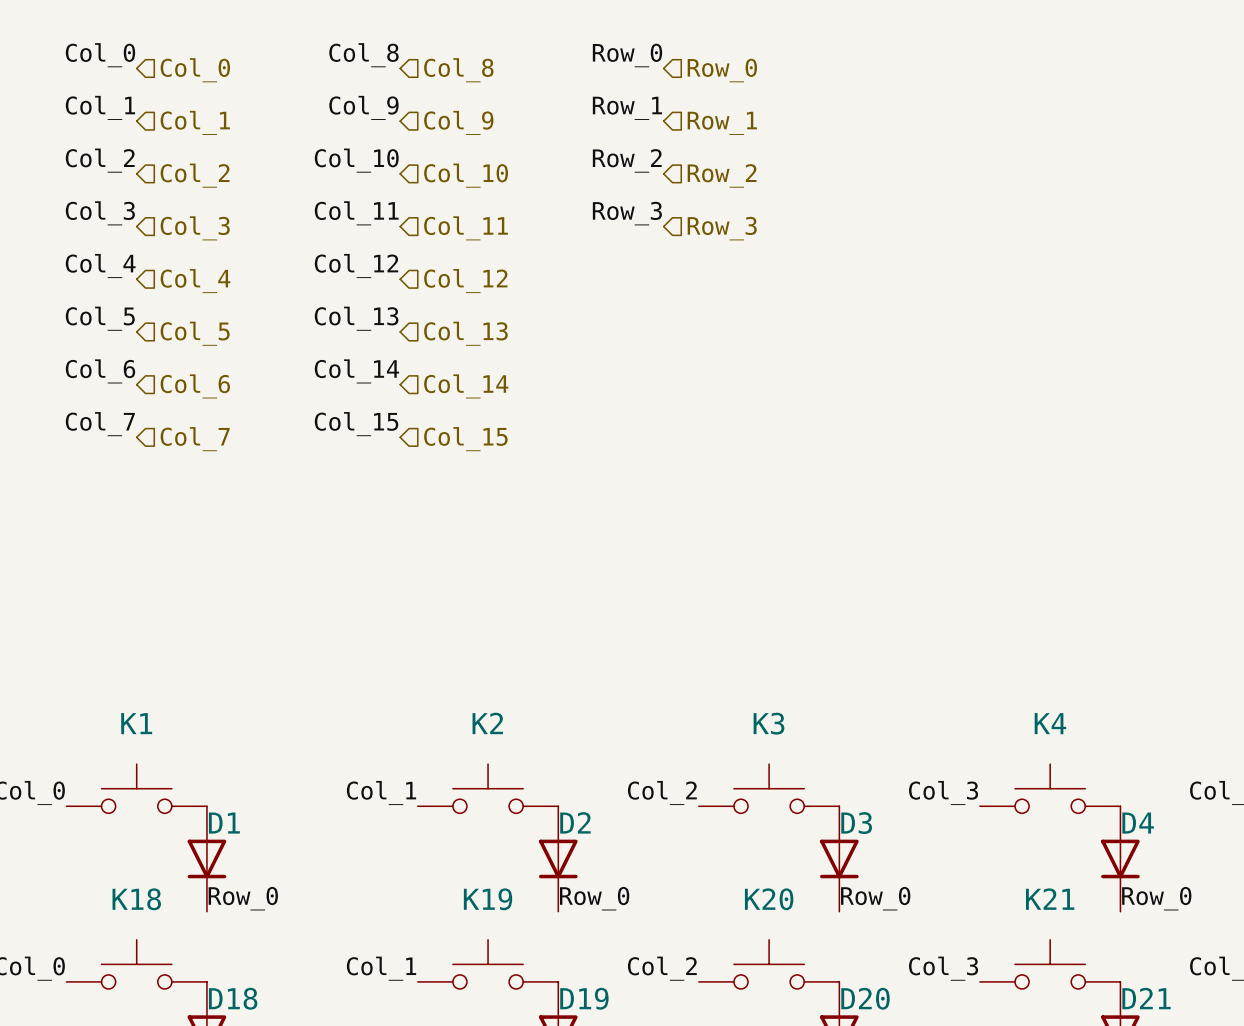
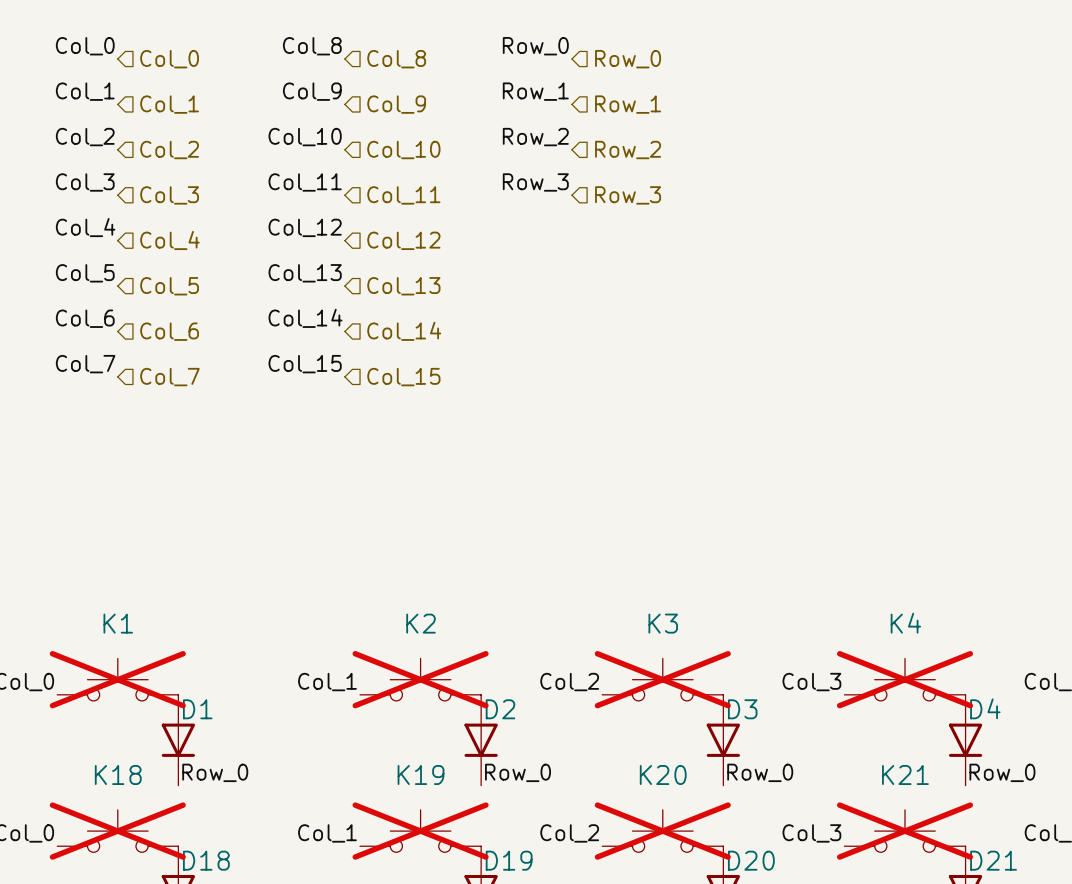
K1 do-not-place cross: none -> (117, 679)
K2 do-not-place cross: none -> (420, 679)
K3 do-not-place cross: none -> (662, 679)
K4 do-not-place cross: none -> (905, 679)
K18 do-not-place cross: none -> (117, 831)
K19 do-not-place cross: none -> (420, 831)
K20 do-not-place cross: none -> (662, 831)
K21 do-not-place cross: none -> (905, 831)

